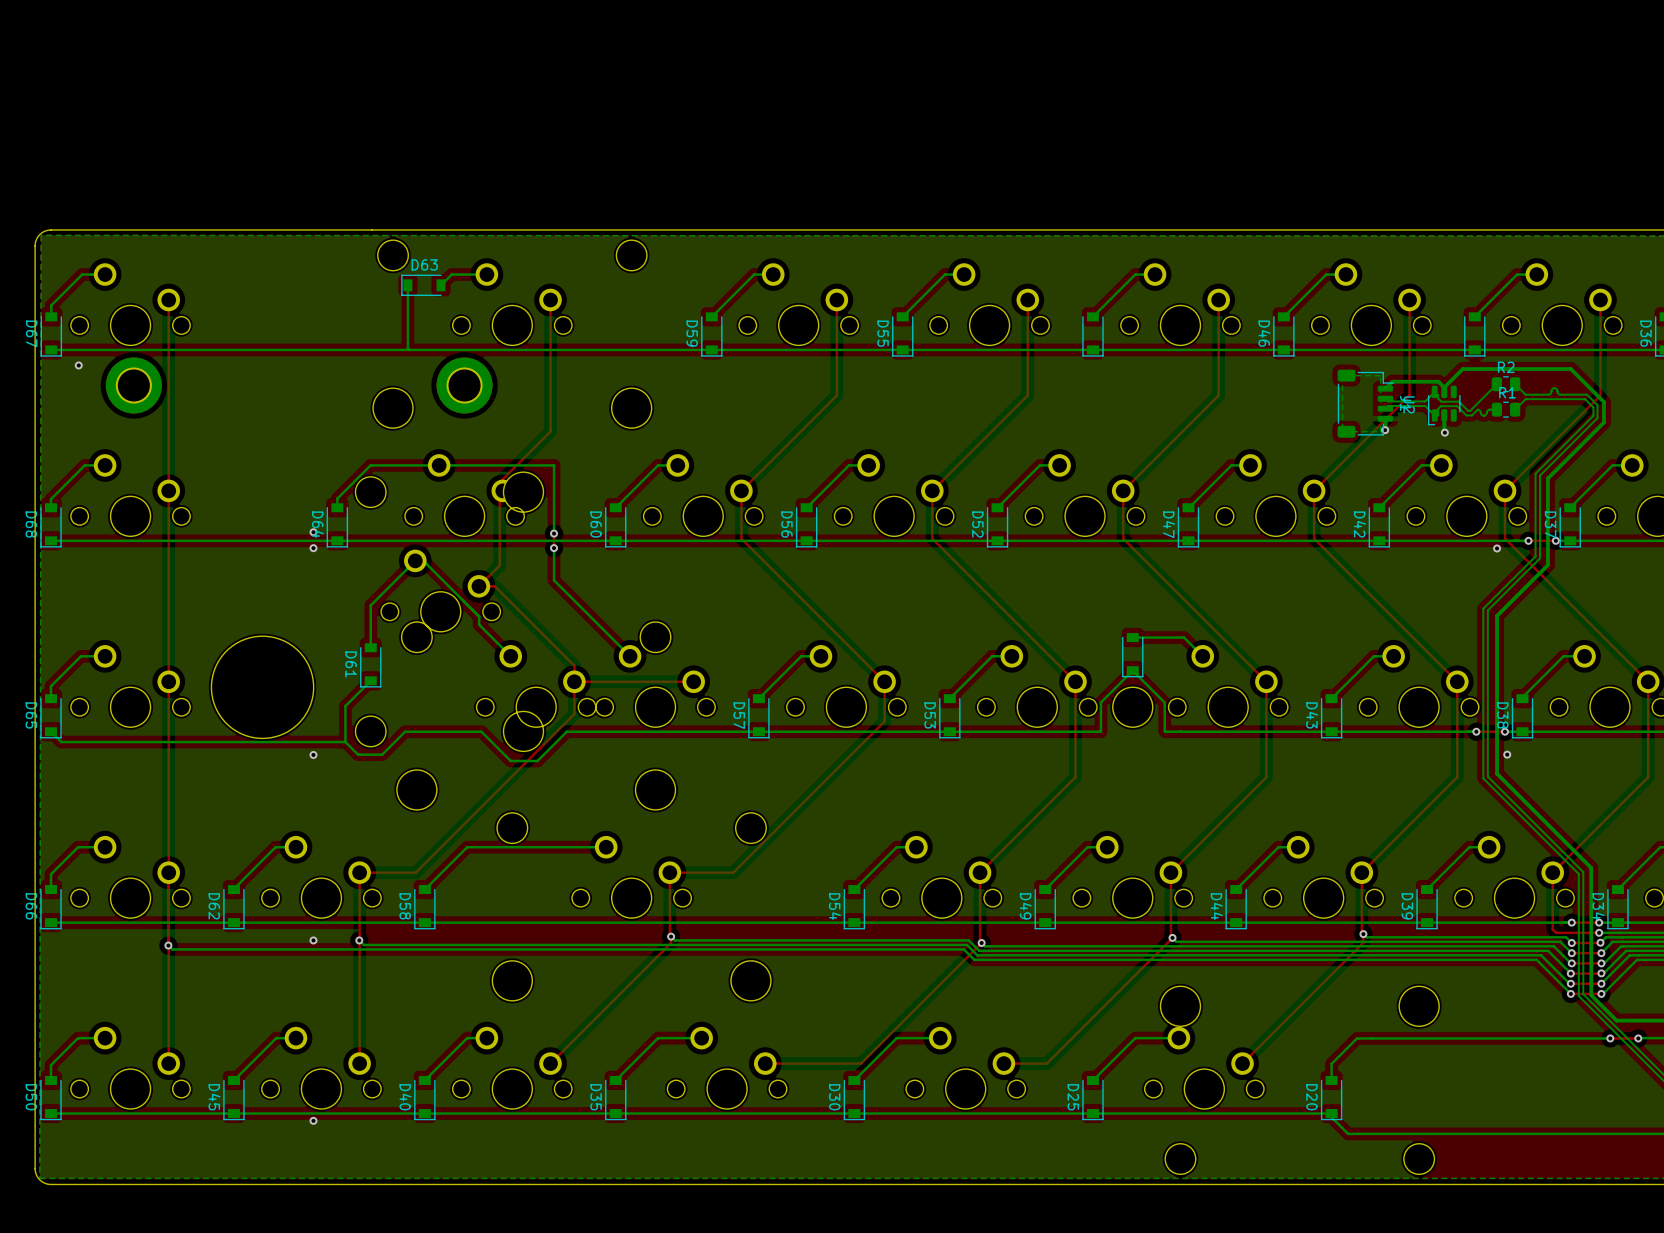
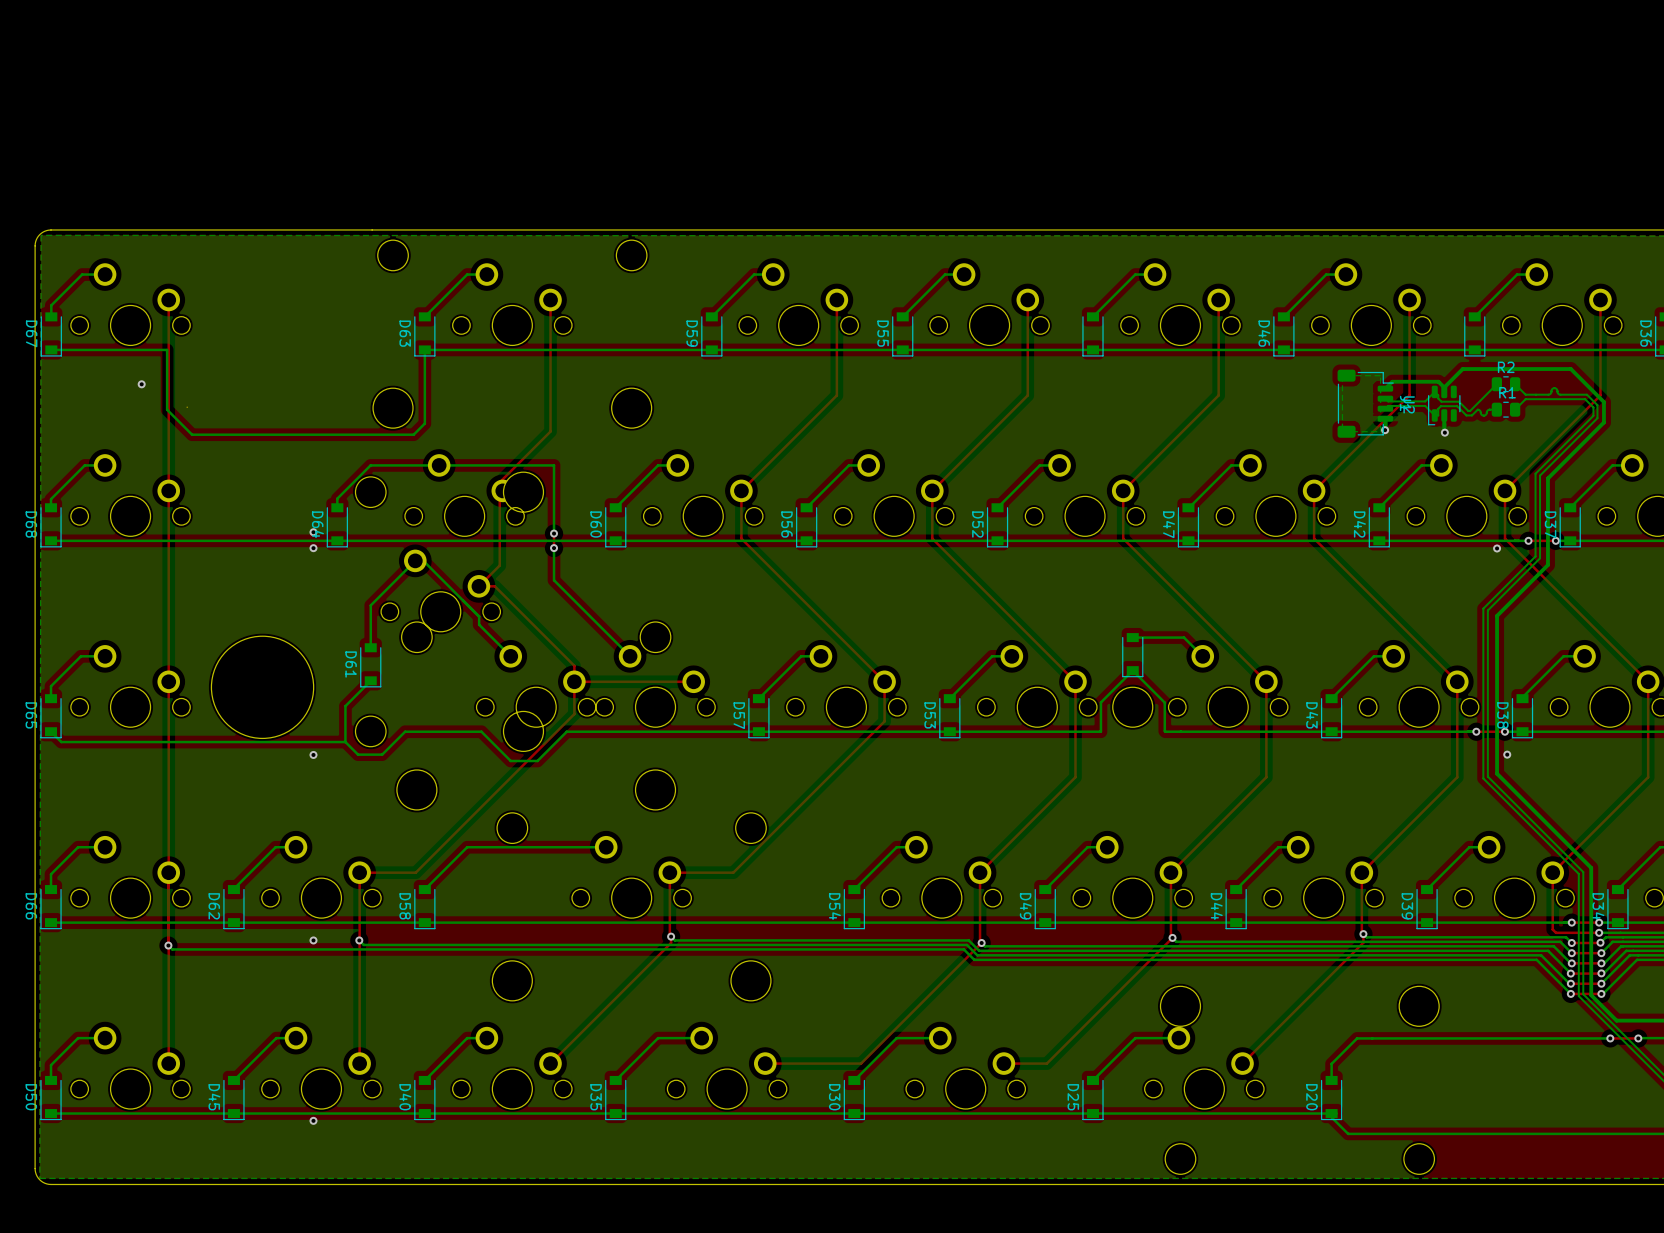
bottom track: (467, 274) (451, 274) (441, 285) -> (467, 274) (424, 316)
bottom track: (407, 285) (409, 349) -> none
D63 rotation: 0° (423, 285) -> 90° counterclockwise (424, 334)
D63 position: (423, 285) -> (424, 334)
bottom track: (421, 349) (167, 349) -> (424, 349) (424, 423) (413, 434) (192, 434) (167, 409) (167, 349)
via: (78, 365) -> none
via: none -> (141, 384)
part: (133, 385) -> none
part: (464, 385) -> none

